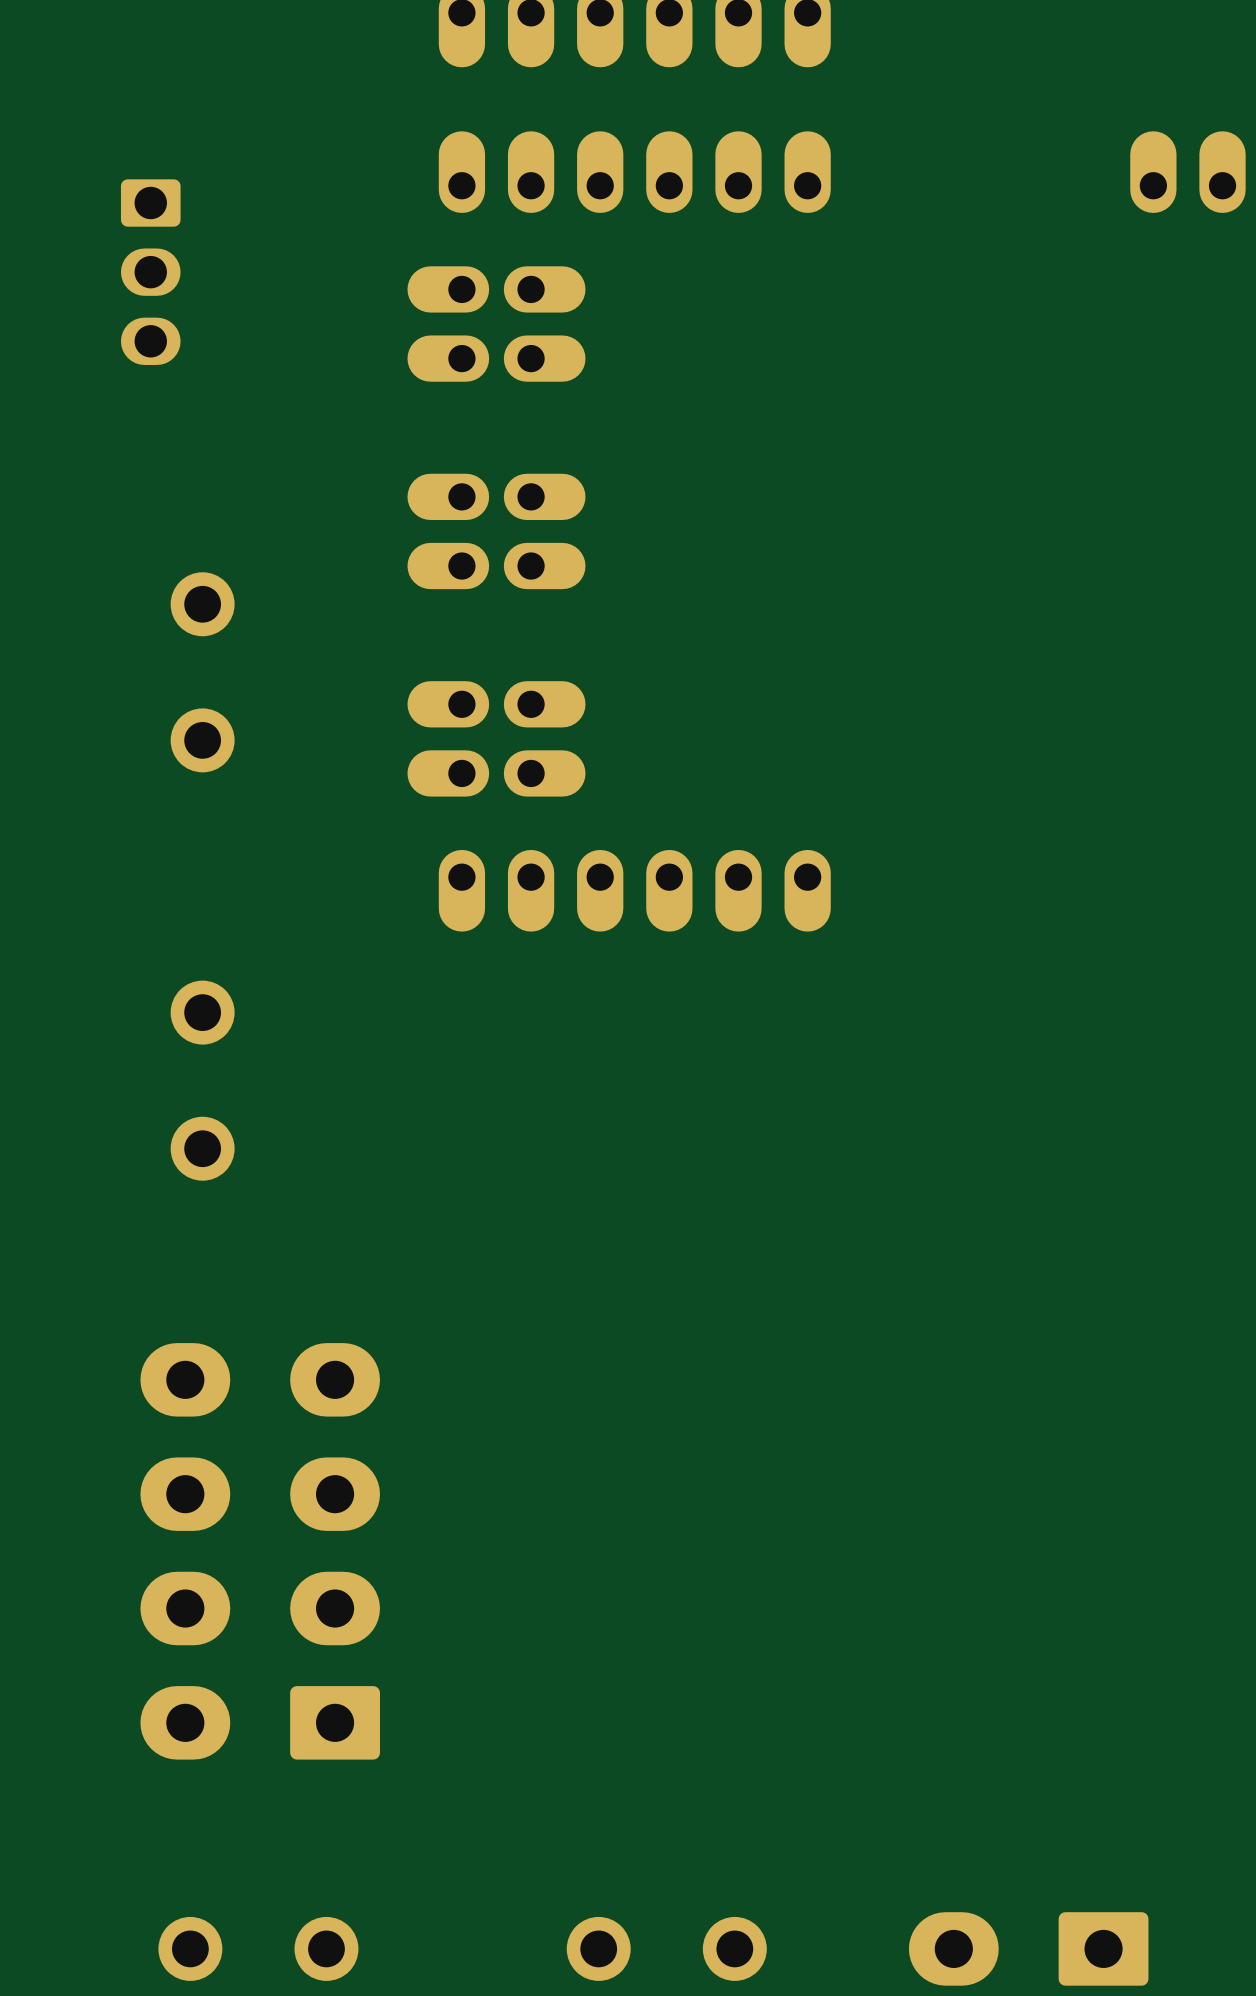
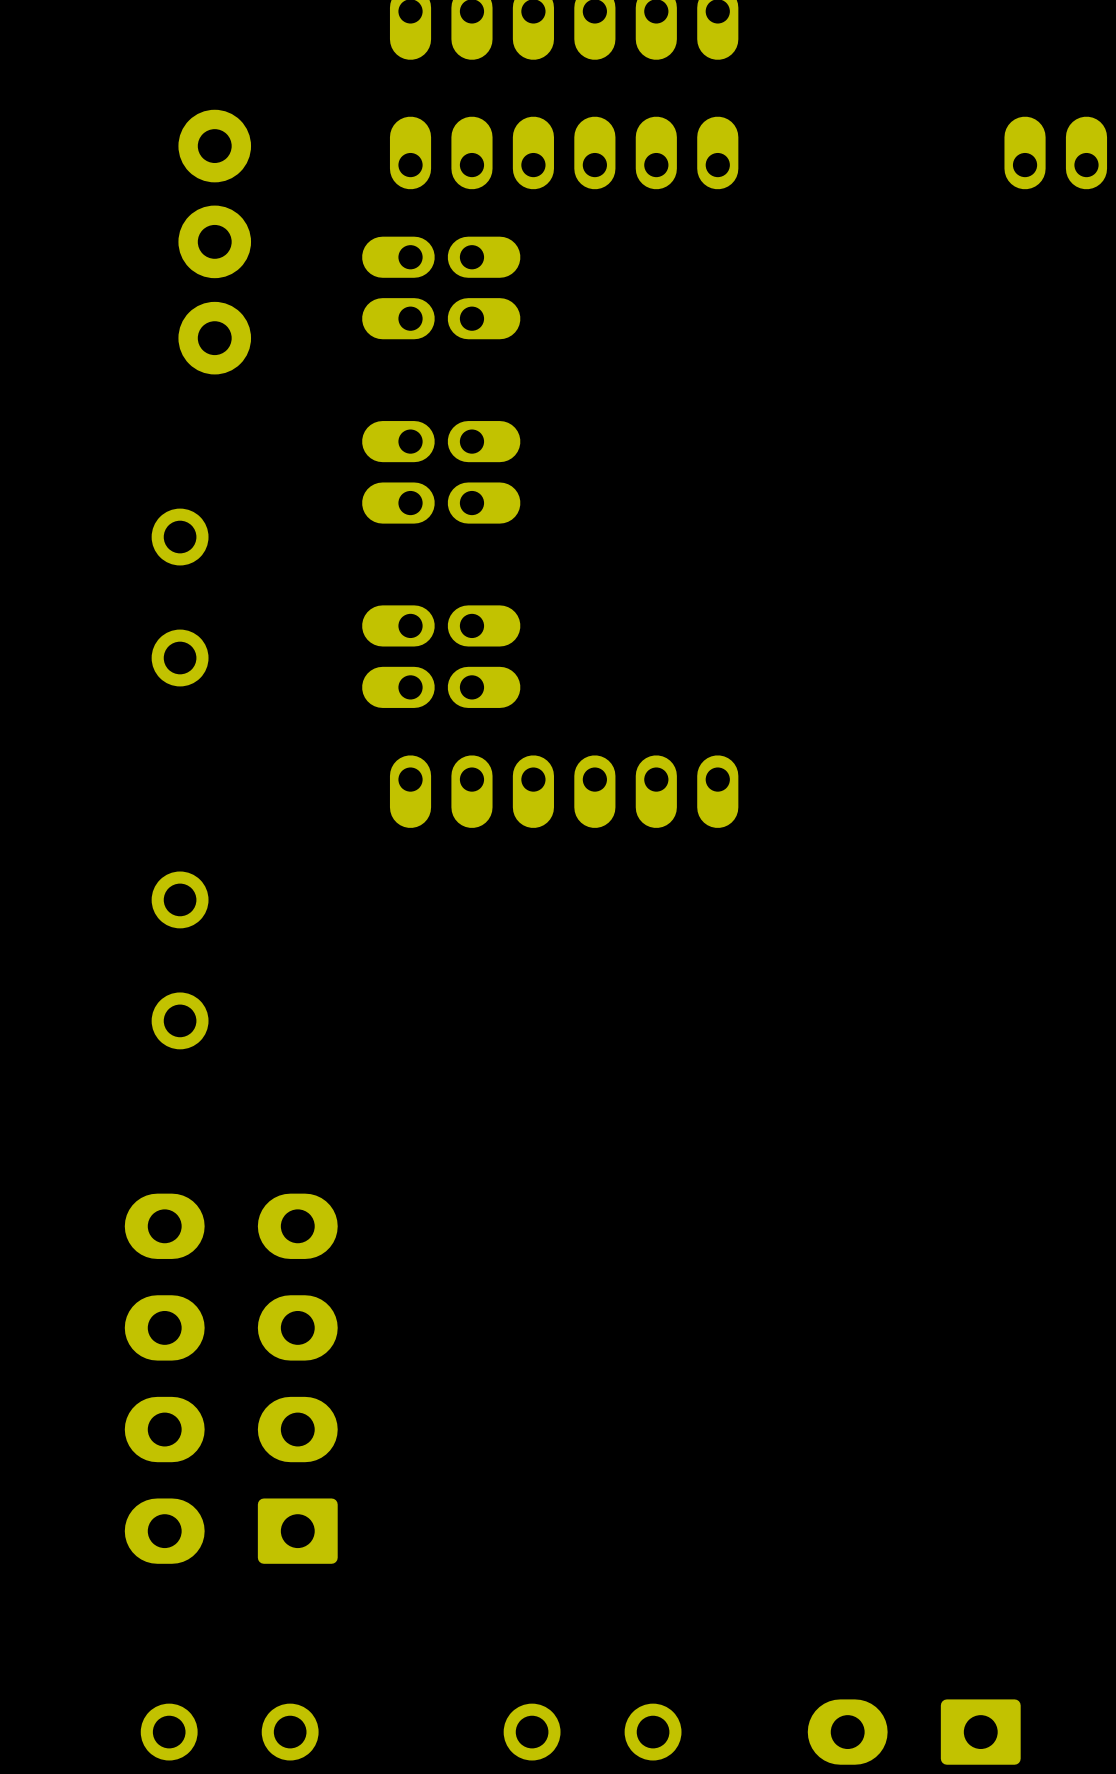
part: (150, 272) -> none
part: none -> (214, 242)

